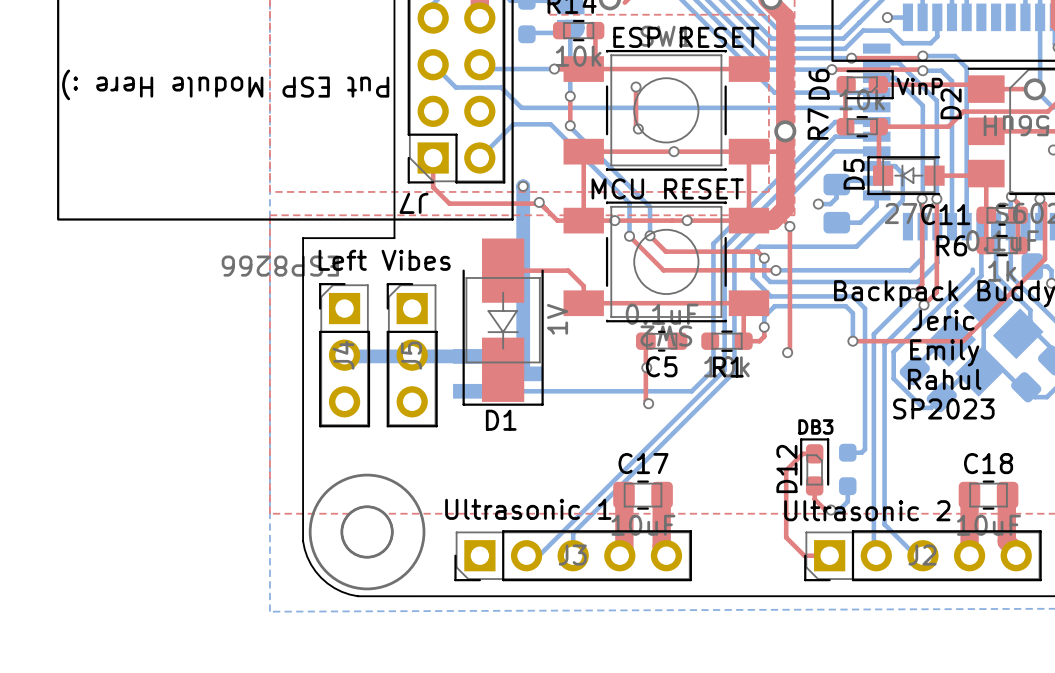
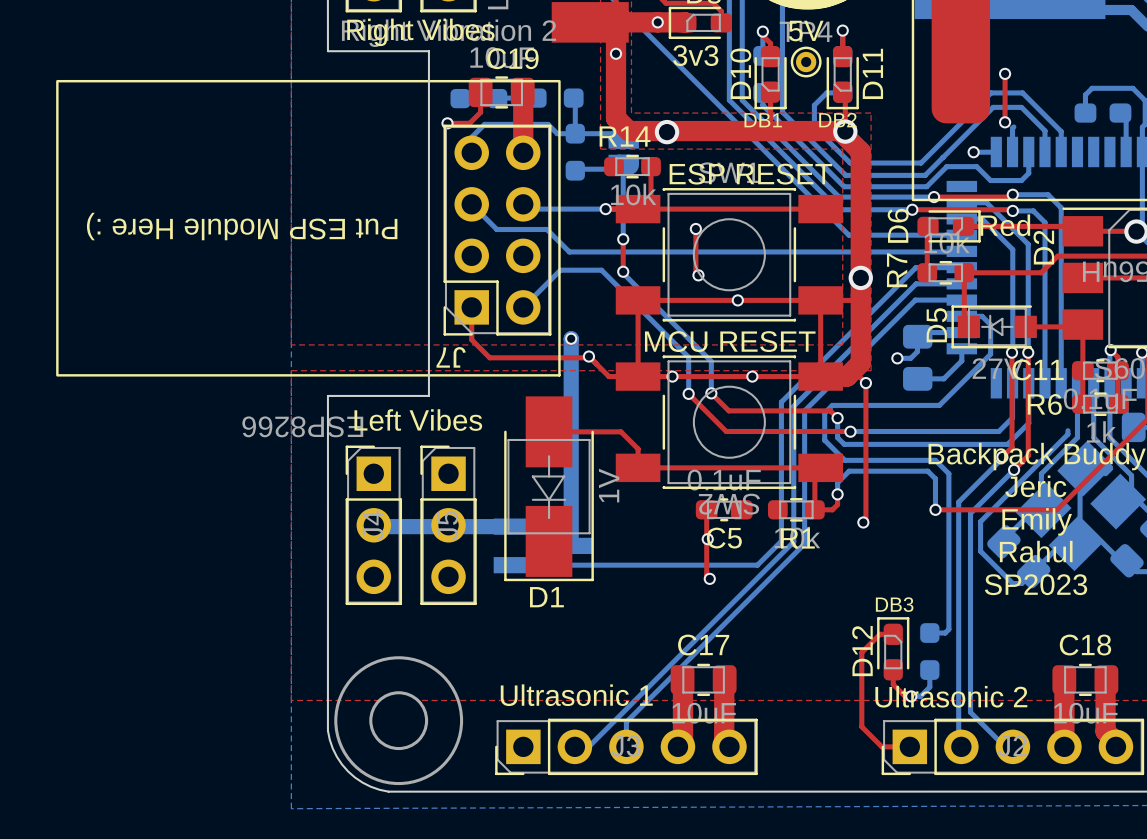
D6 value: VinP (919, 86) -> Red (1005, 225)
bottom track: none -> (1110, 468) (1105, 473)

